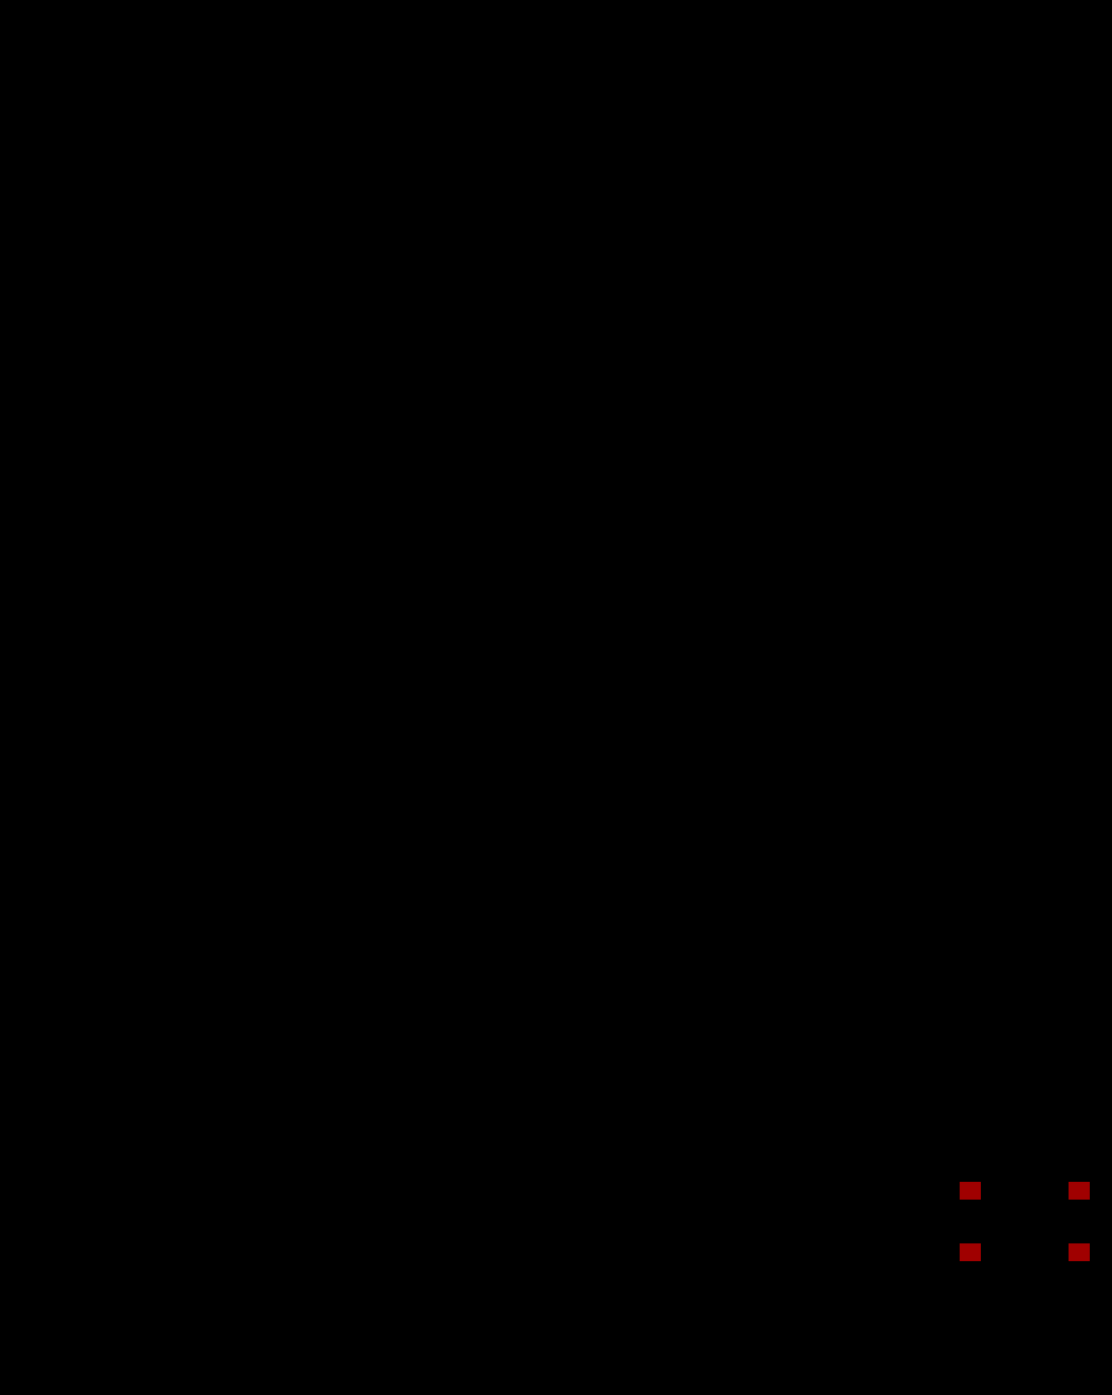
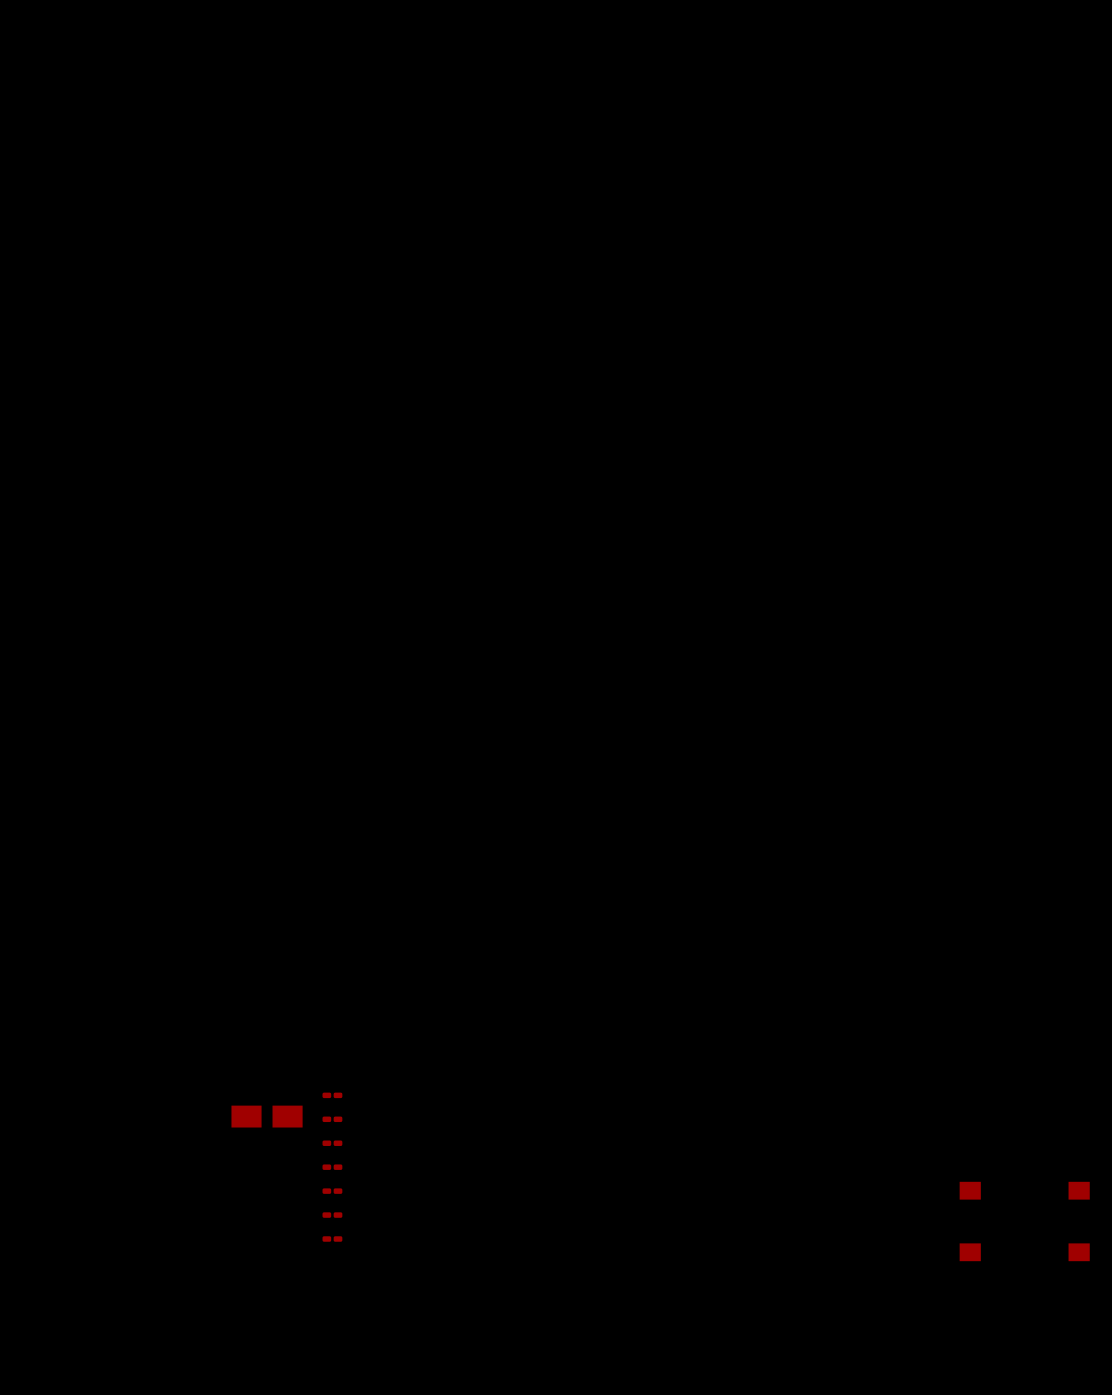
part: none -> (332, 1095)
part: none -> (267, 1116)
part: none -> (332, 1119)
part: none -> (332, 1143)
part: none -> (332, 1167)
part: none -> (332, 1191)
part: none -> (332, 1215)
part: none -> (332, 1239)

